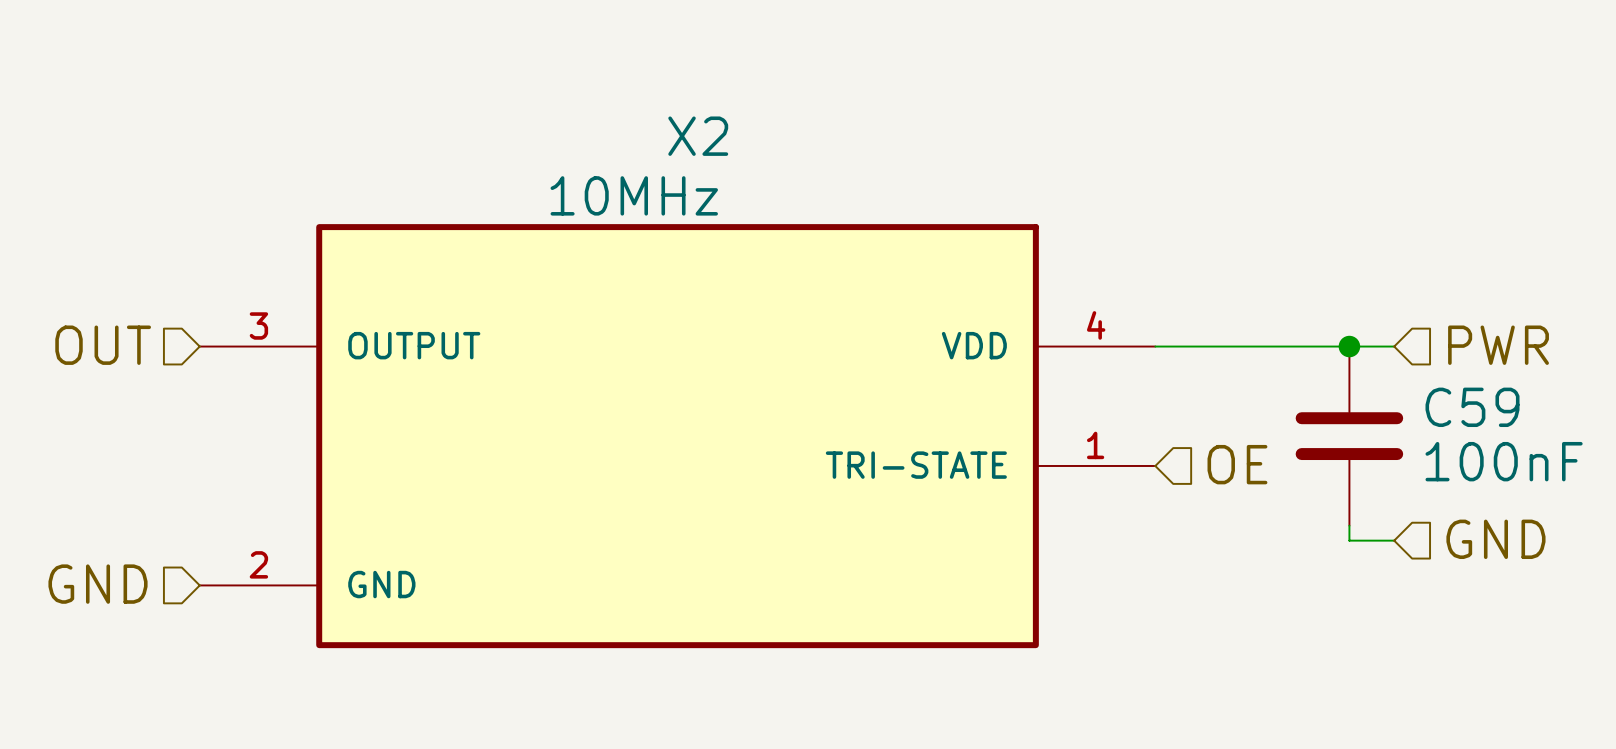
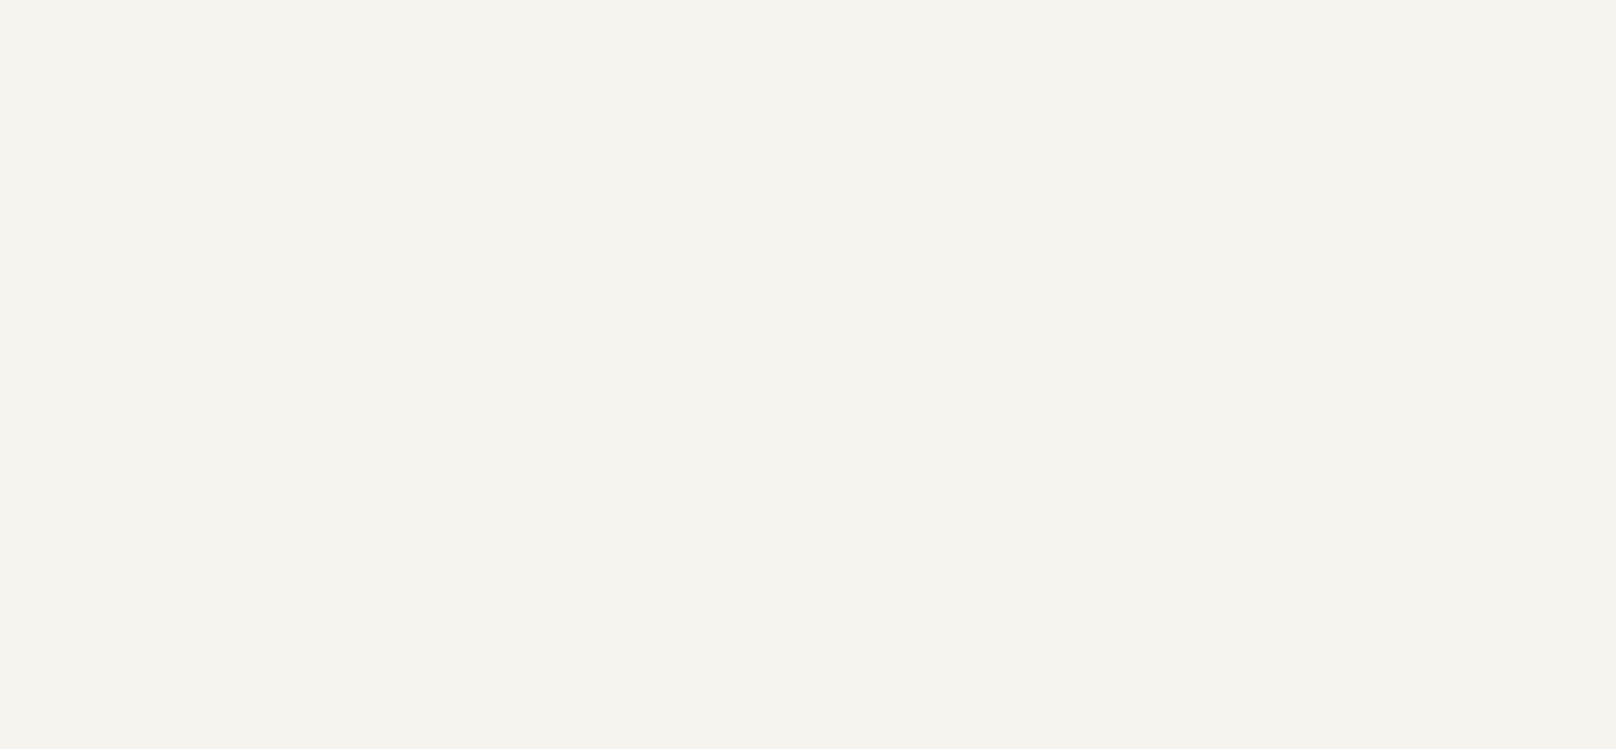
hierarchical label: OUT (103, 345) -> none
hierarchical label: PWR (1498, 345) -> none
wire: (1155, 346) (1394, 346) -> none
junction: (1349, 346) -> none
X2: 10MHz (677, 436) -> none
C59: 100nF (1349, 436) -> none
hierarchical label: OE (1237, 464) -> none
wire: (1349, 525) (1349, 540) (1394, 540) -> none
hierarchical label: GND (1495, 539) -> none
hierarchical label: GND (98, 584) -> none

